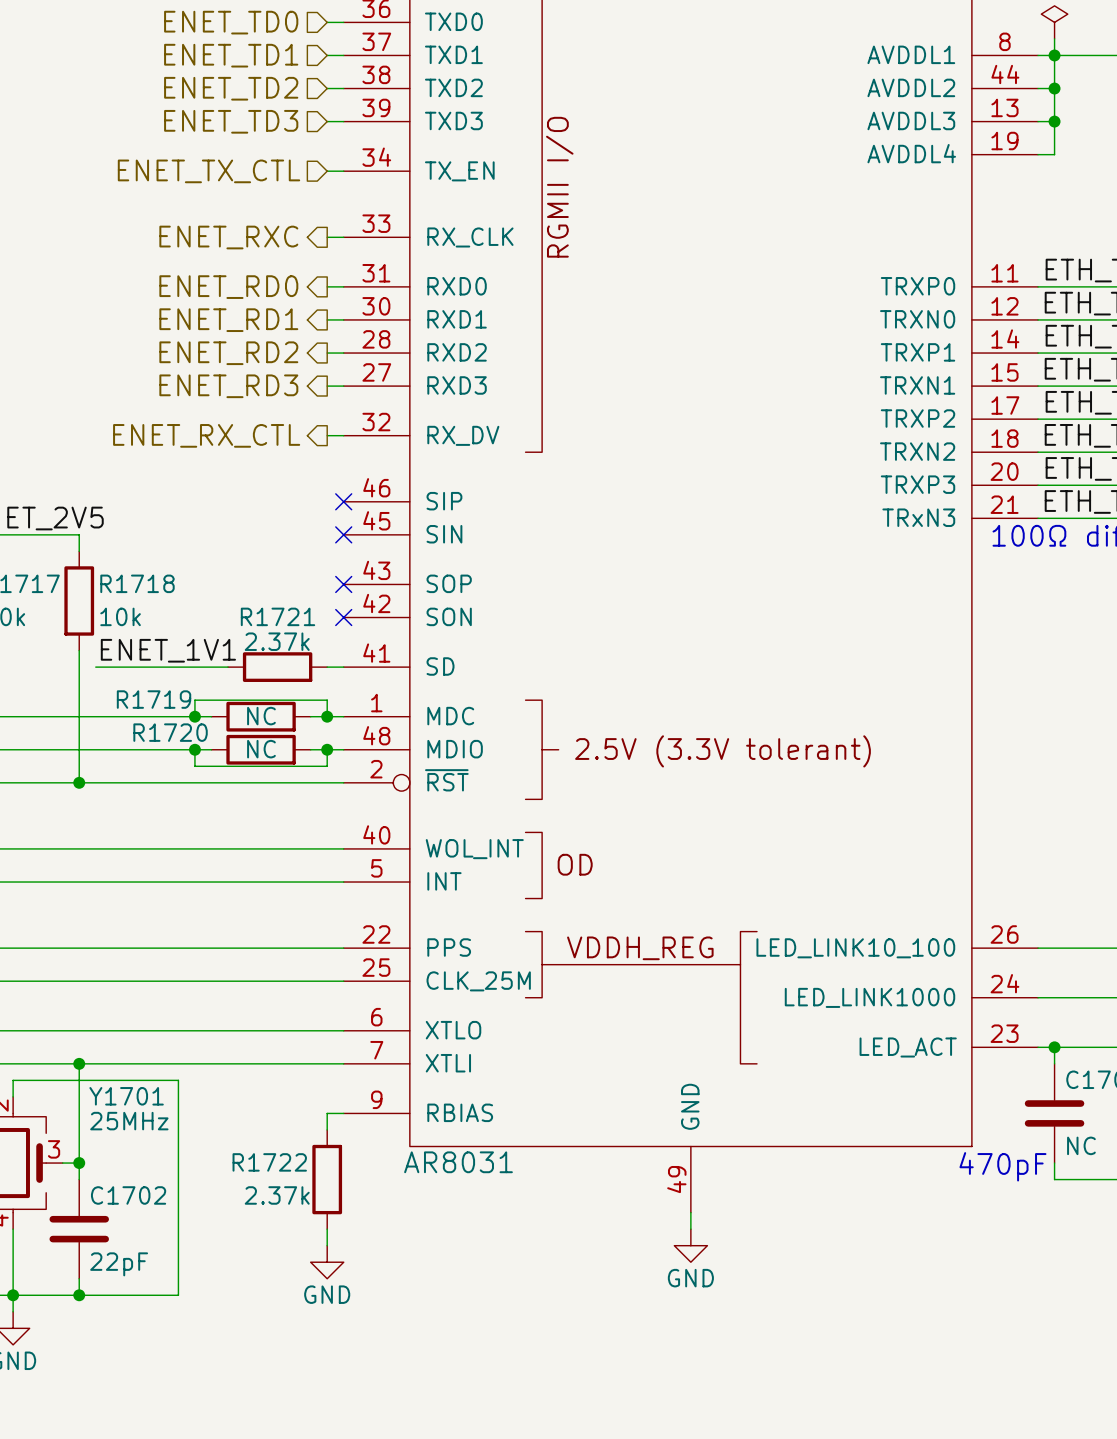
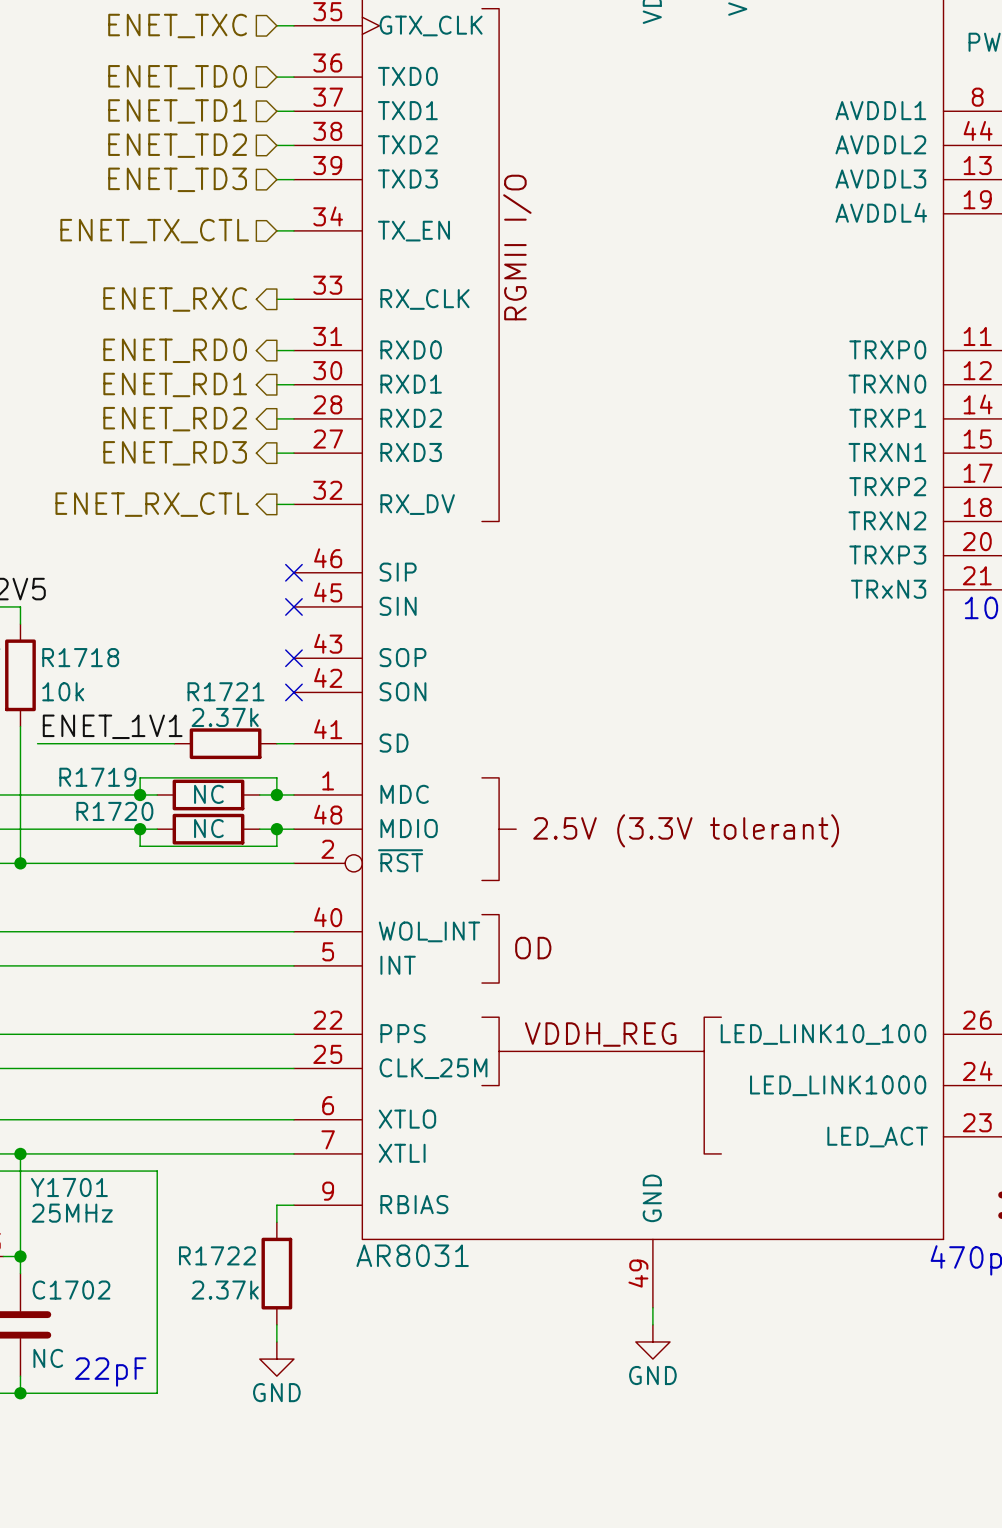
wire: (178, 1080) (178, 1295) -> (123, 1171) (157, 1171) (157, 1393) (123, 1393)
C1702 value: 22pF (119, 1264) -> NC (48, 1358)
text: none -> 22pF (110, 1372)

